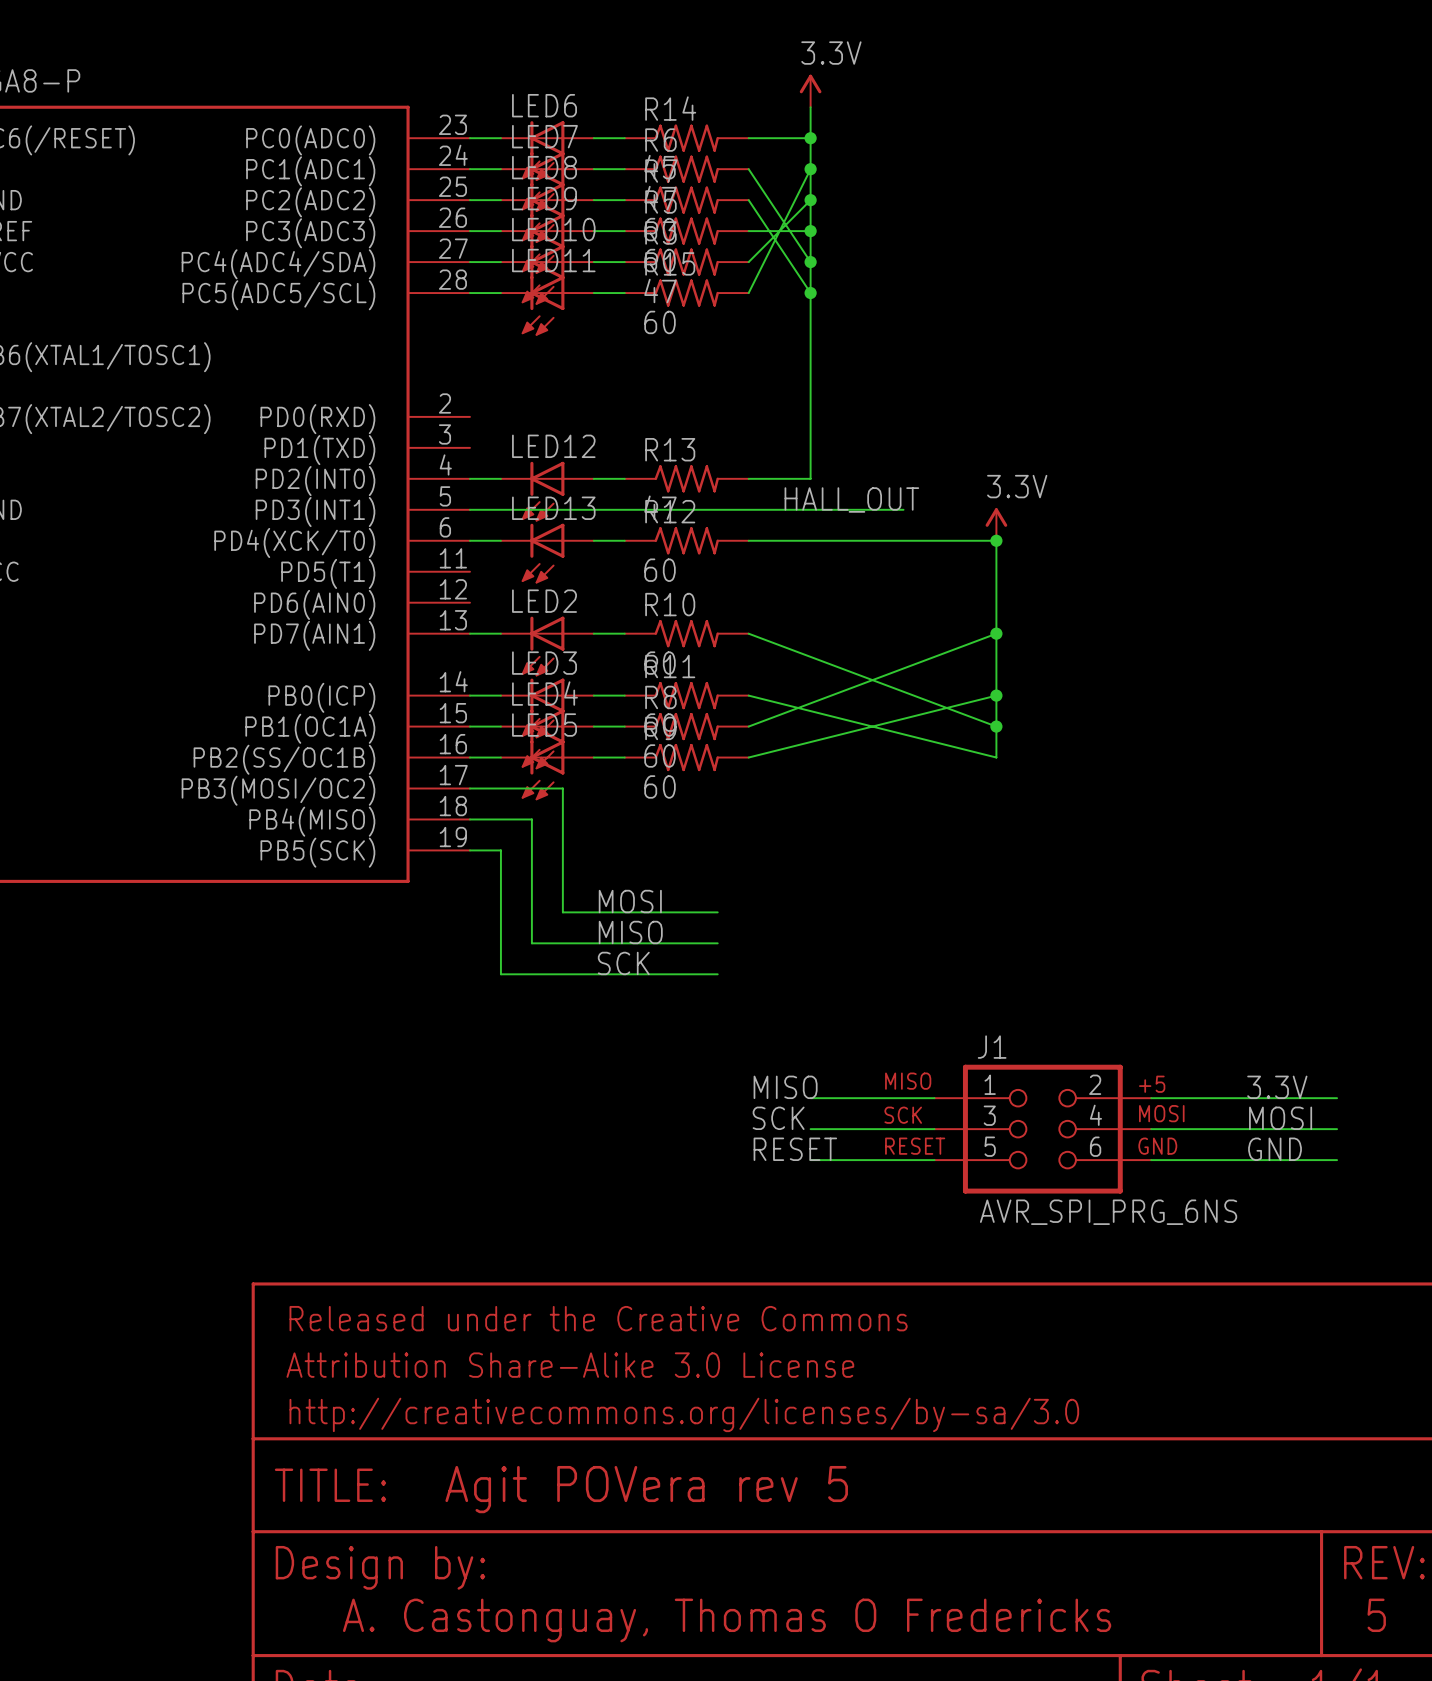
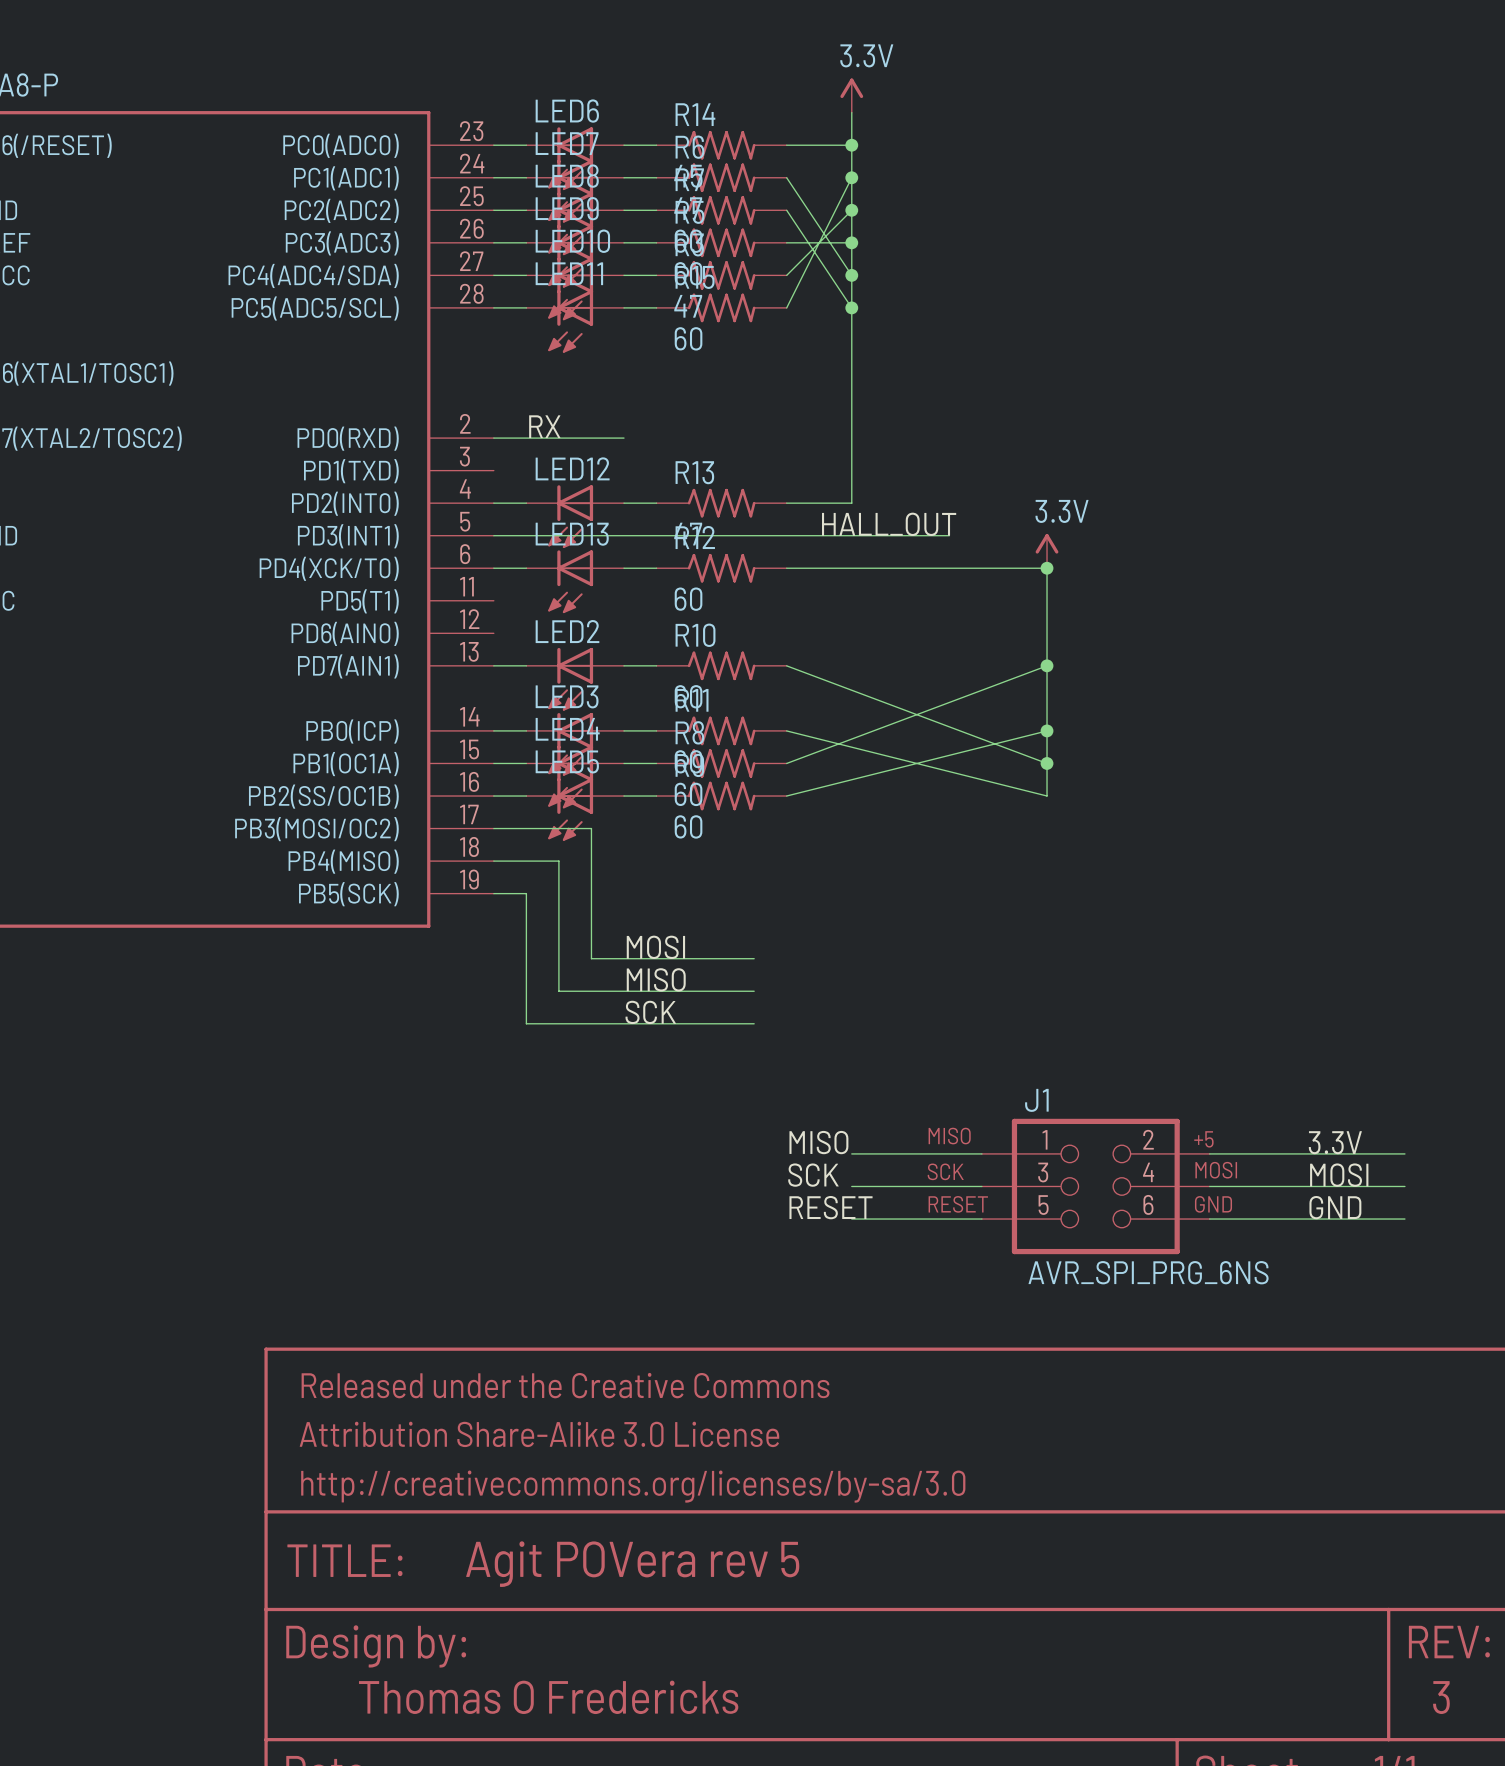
label: none -> RX (544, 426)
wire: none -> (493, 438) (624, 438)
text: 5 (1376, 1615) -> 3 (1441, 1697)
text: A. Castonguay, Thomas O Fredericks (727, 1620) -> Thomas O Fredericks (548, 1697)

